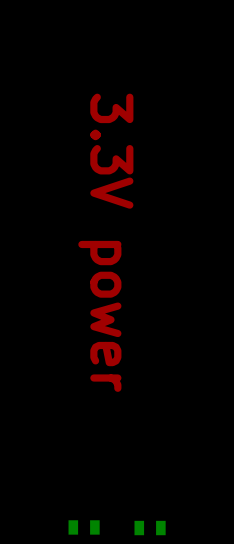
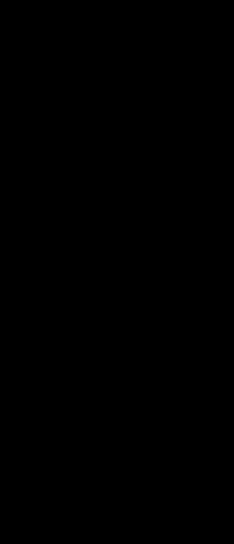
text: 3.3V power (105, 242) -> none
part: (84, 527) -> none
part: (150, 528) -> none

